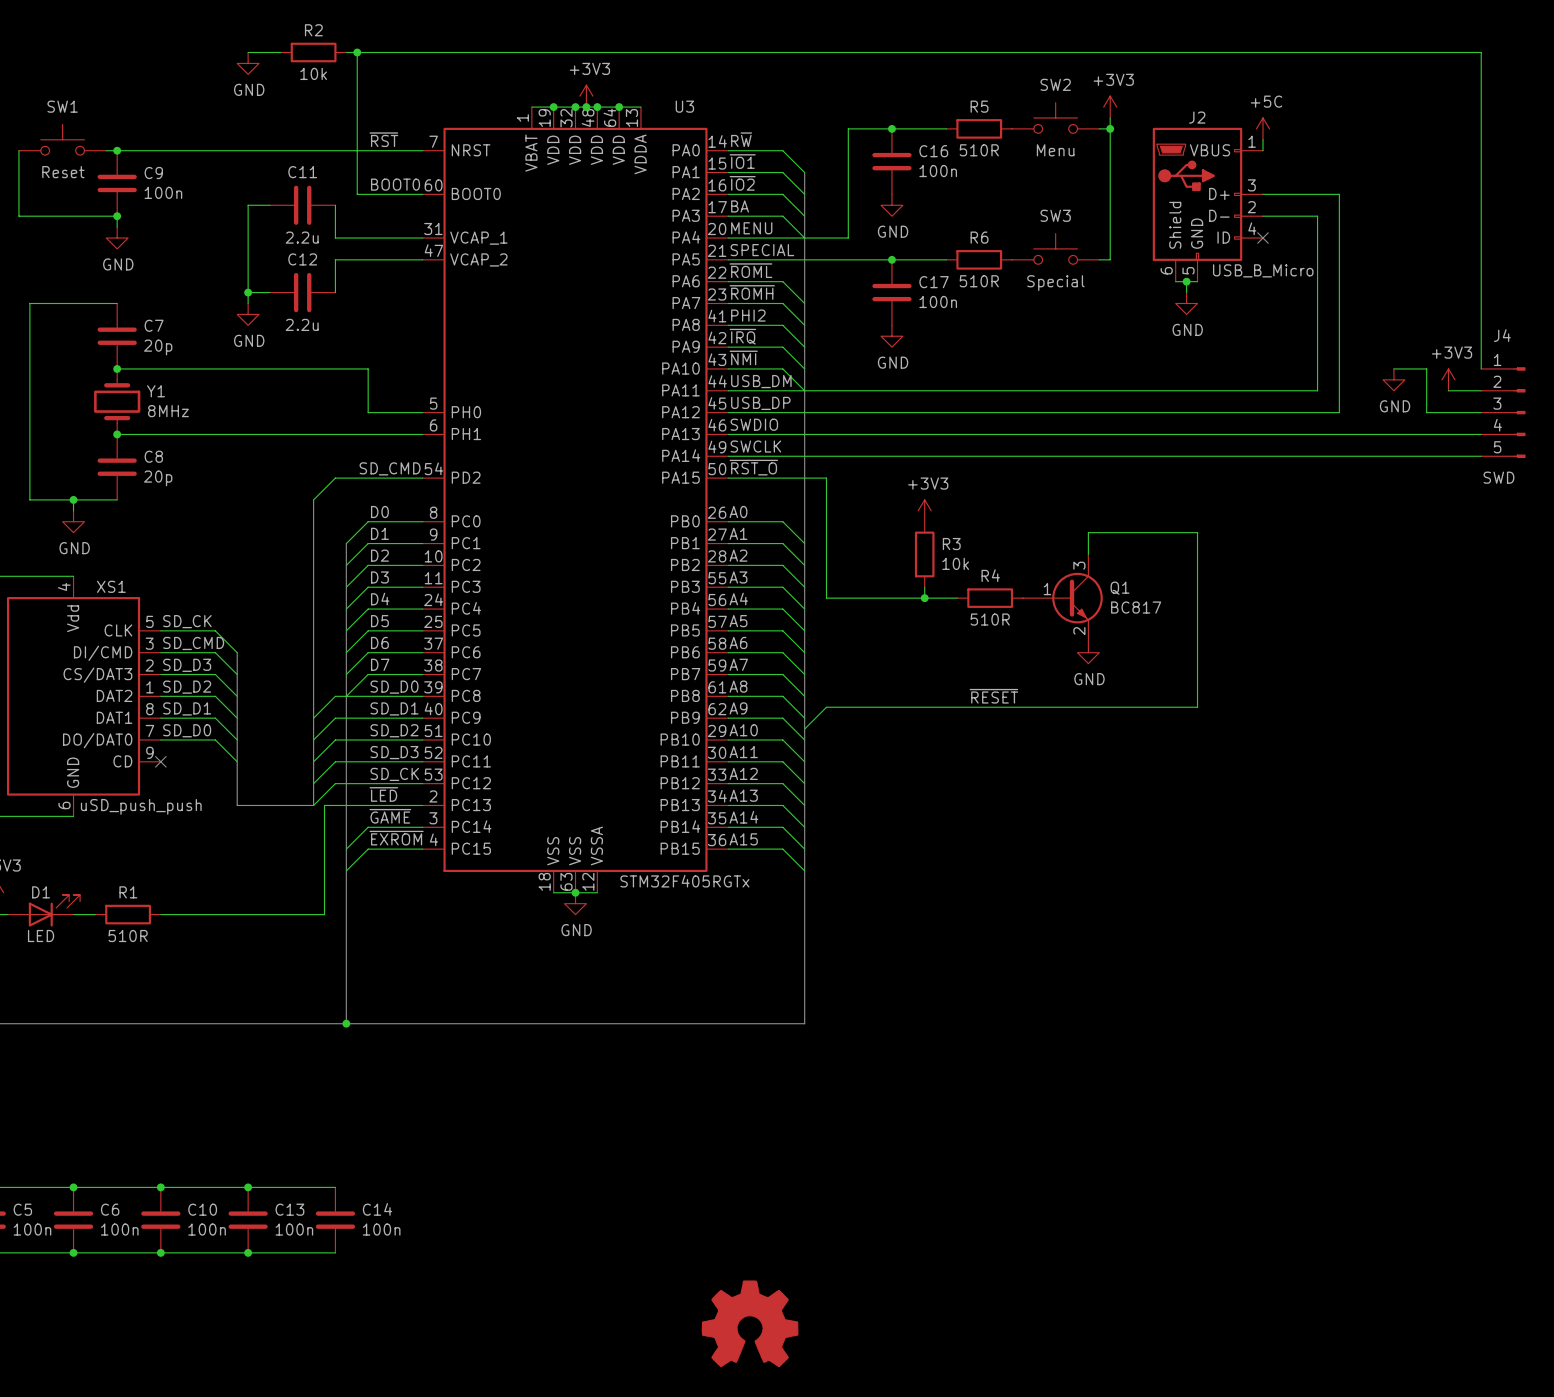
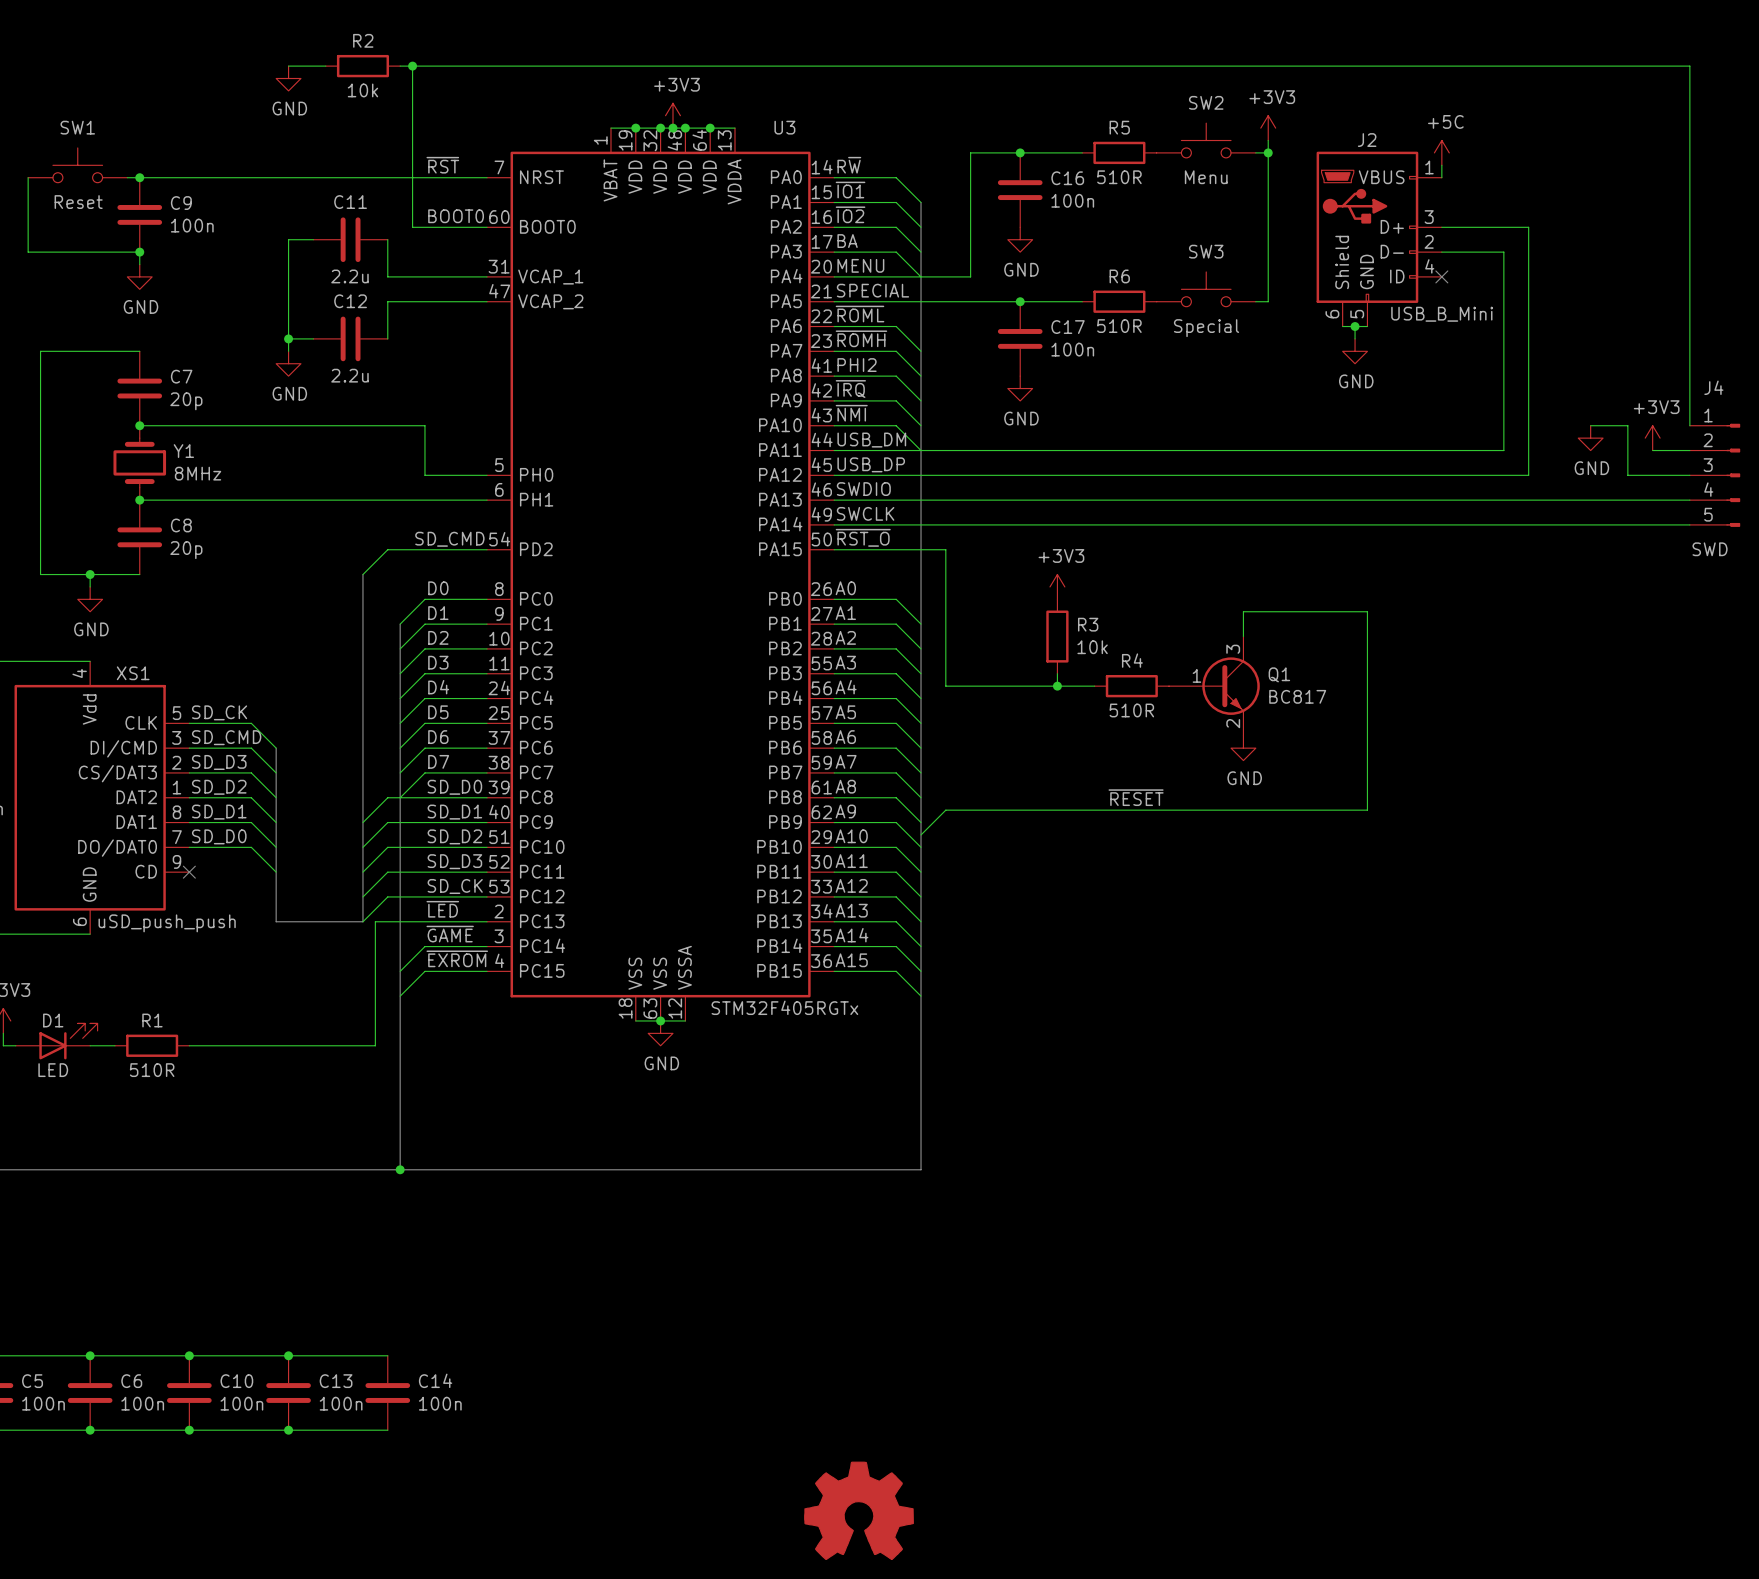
J2 value: USB_B_Micro (1263, 270) -> USB_B_Mini (1442, 314)

